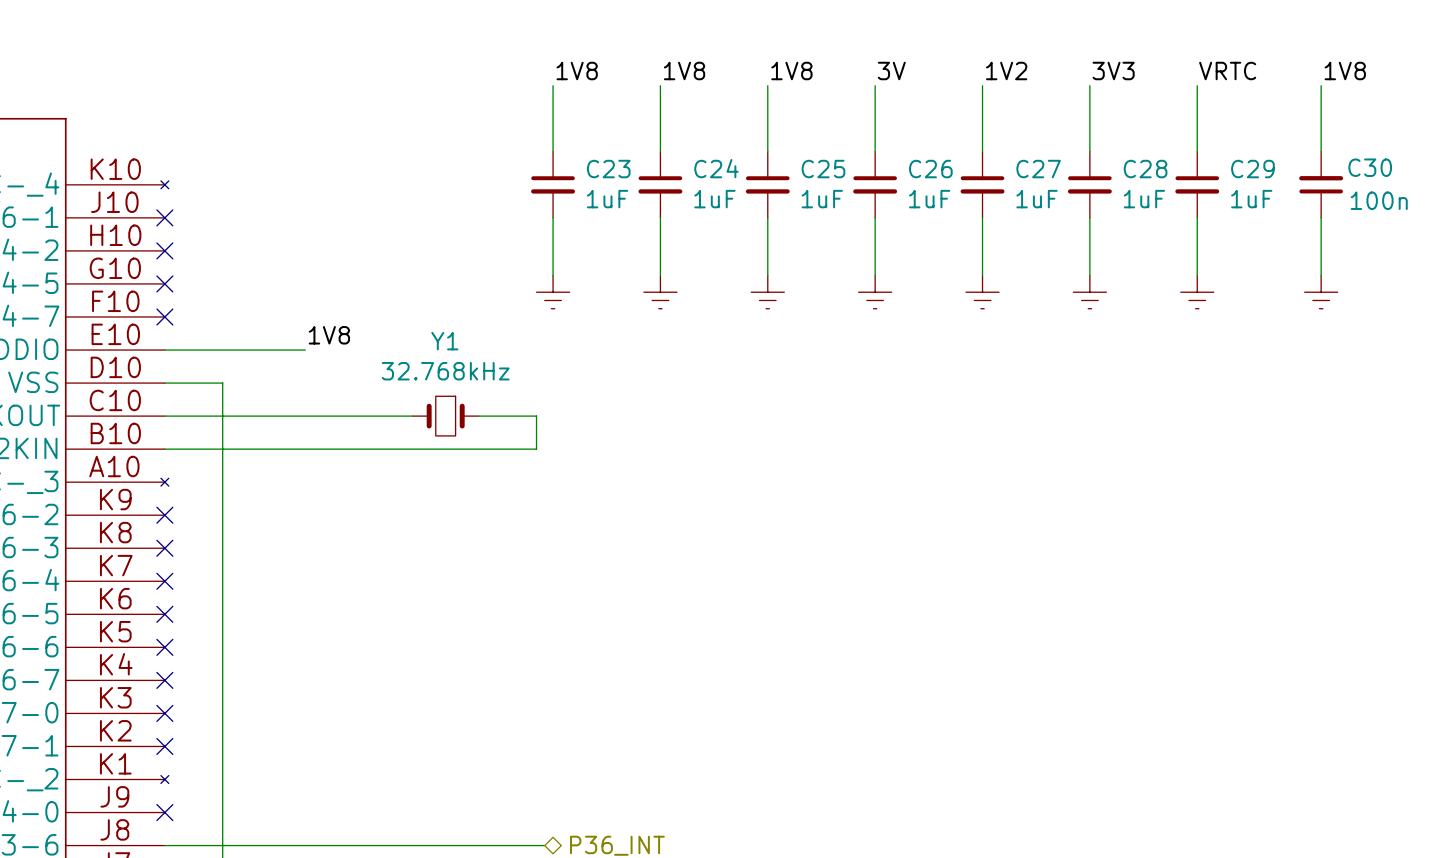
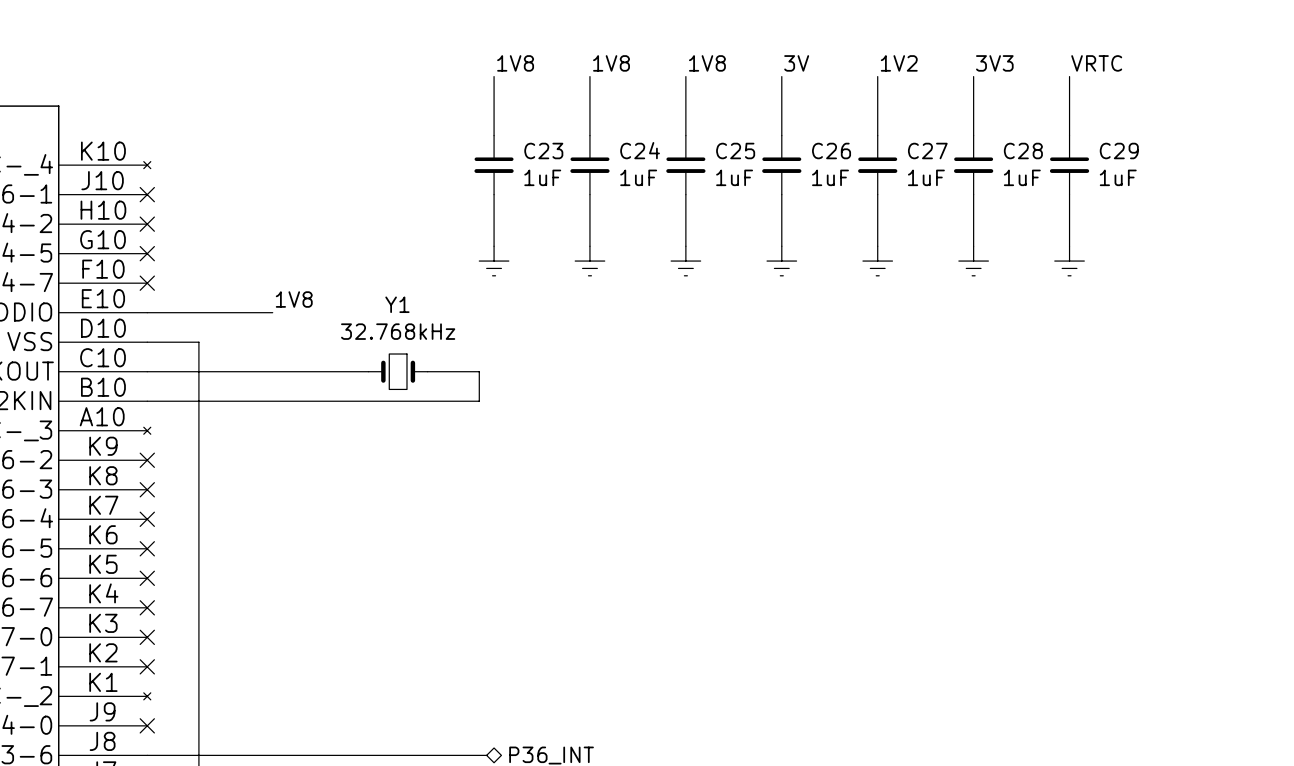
label: 1V8 (1345, 70) -> none
wire: (1321, 85) (1321, 151) -> none
C30: 100n (1321, 184) -> none
wire: (1321, 217) (1321, 275) -> none
power symbol: (1321, 292) -> none

